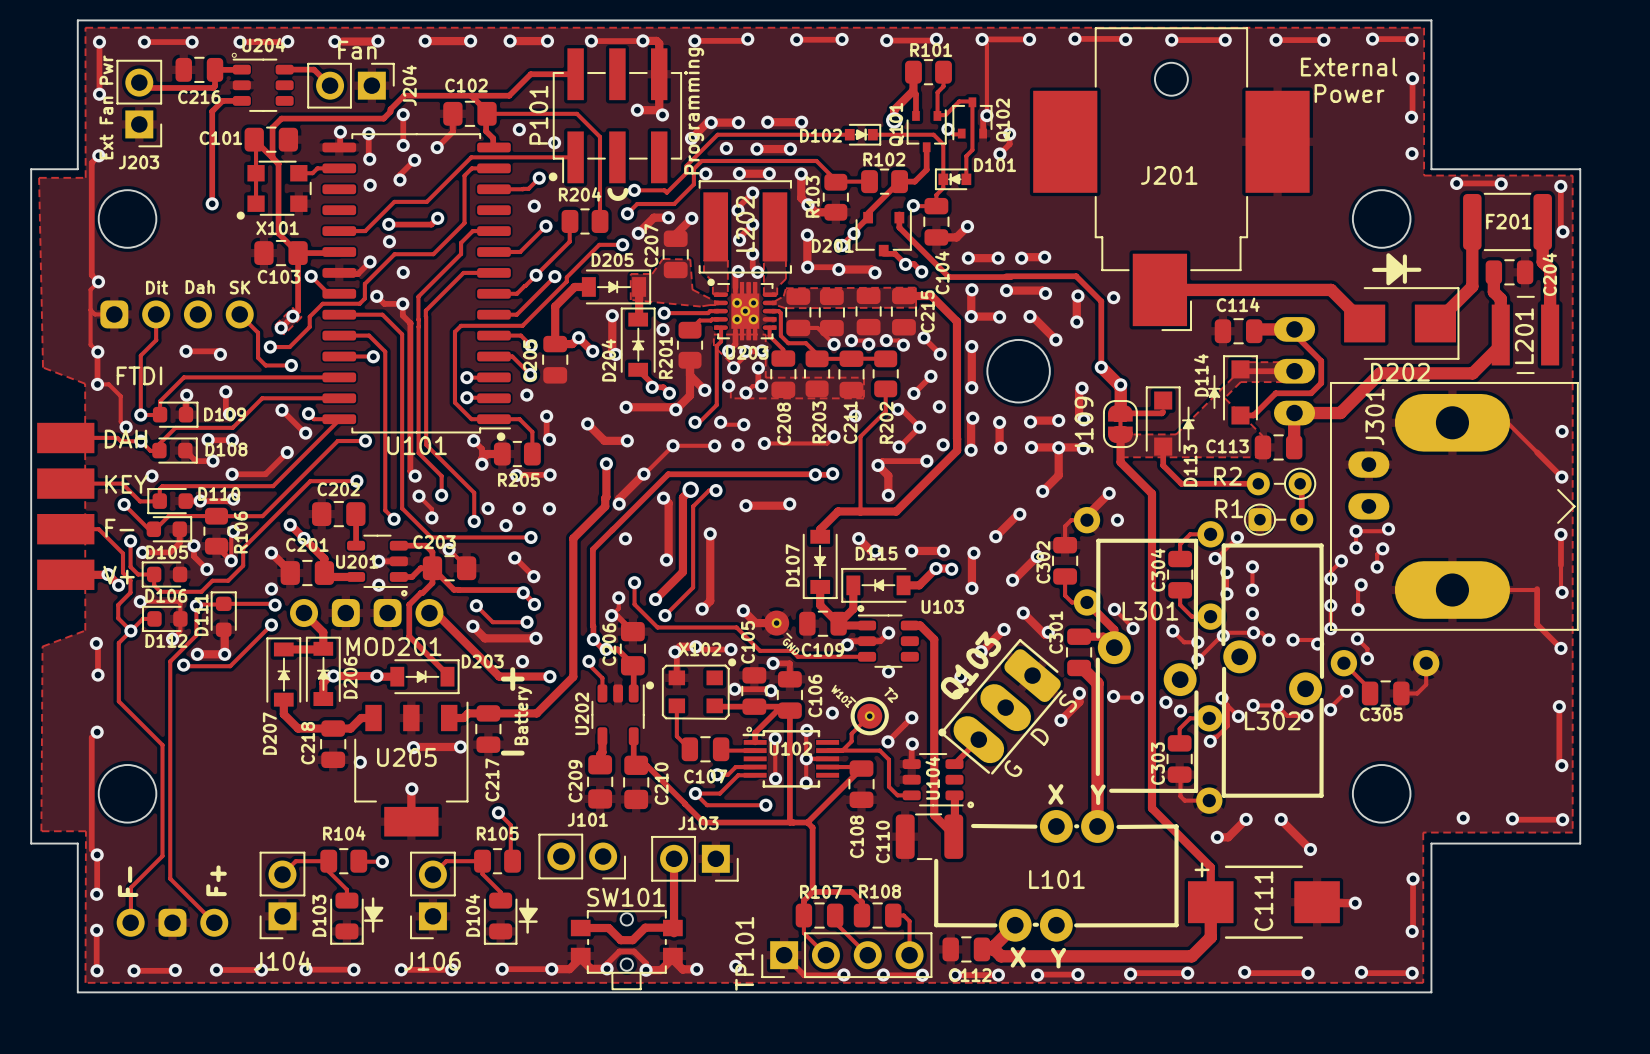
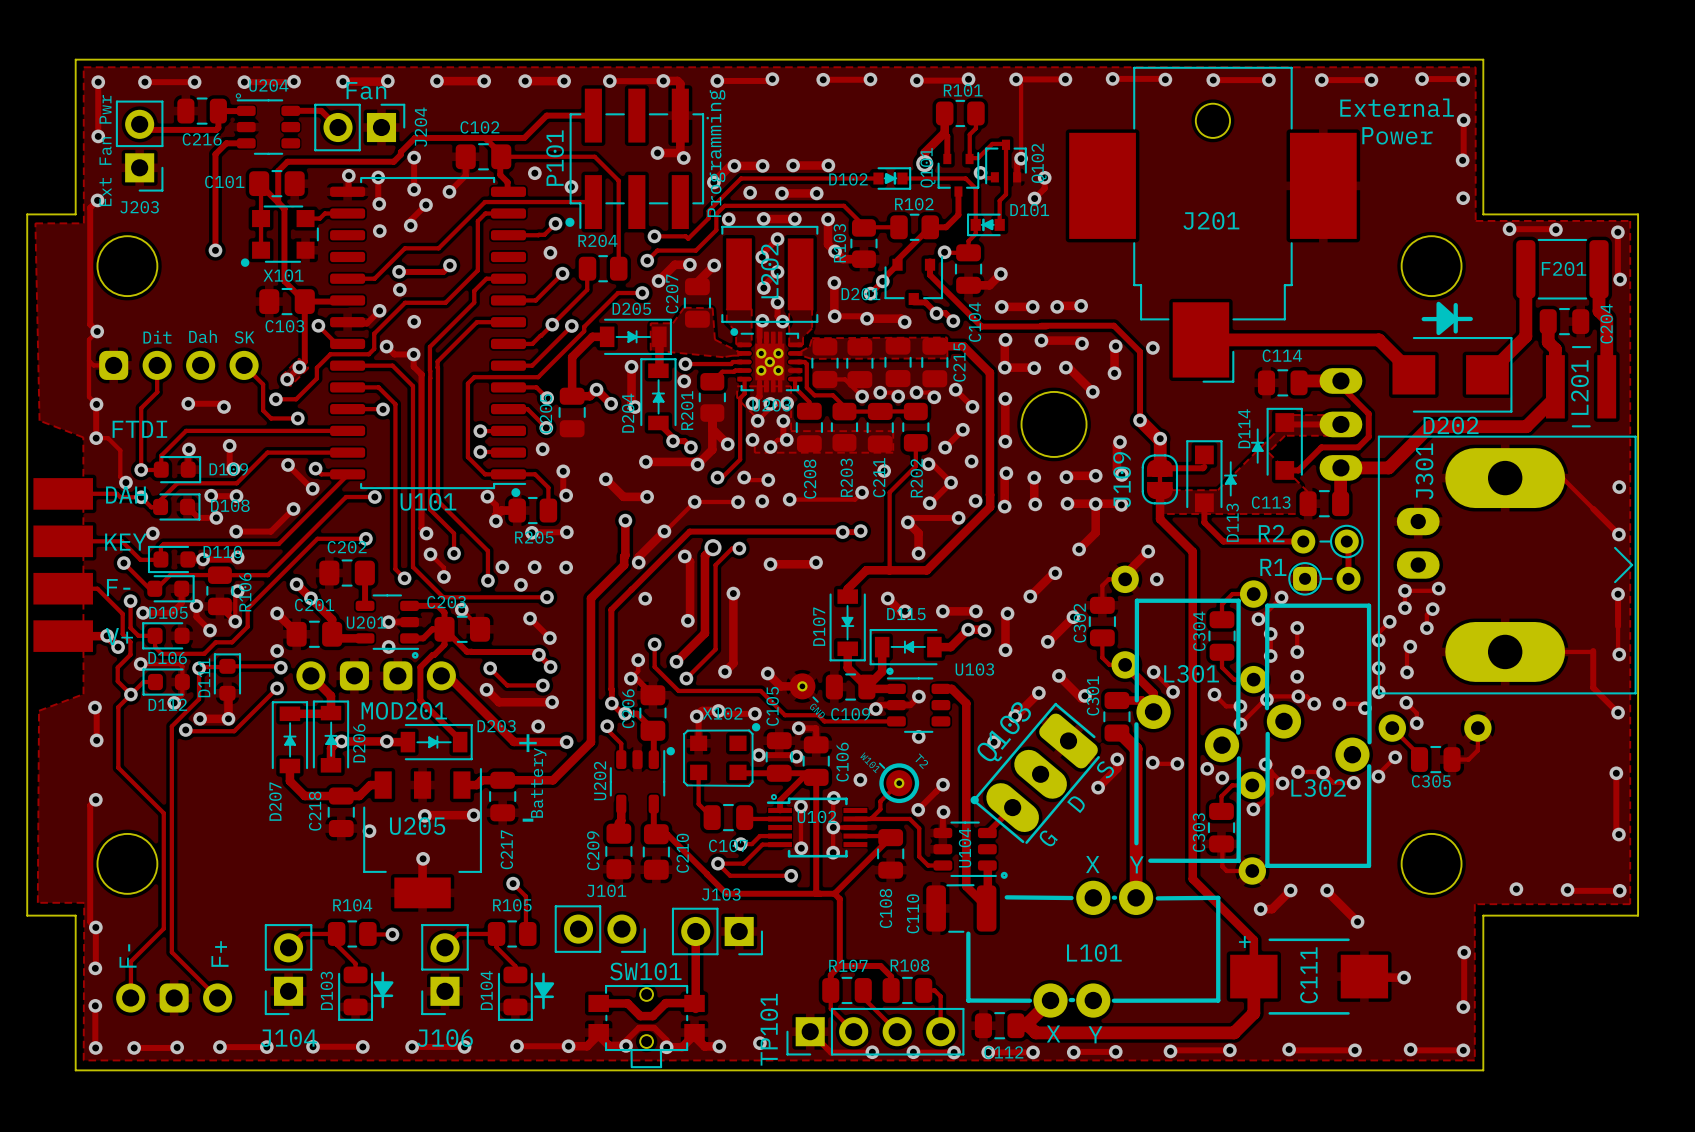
line: (609, 190) (612, 196) (617, 198) (623, 196) (626, 190) -> none

